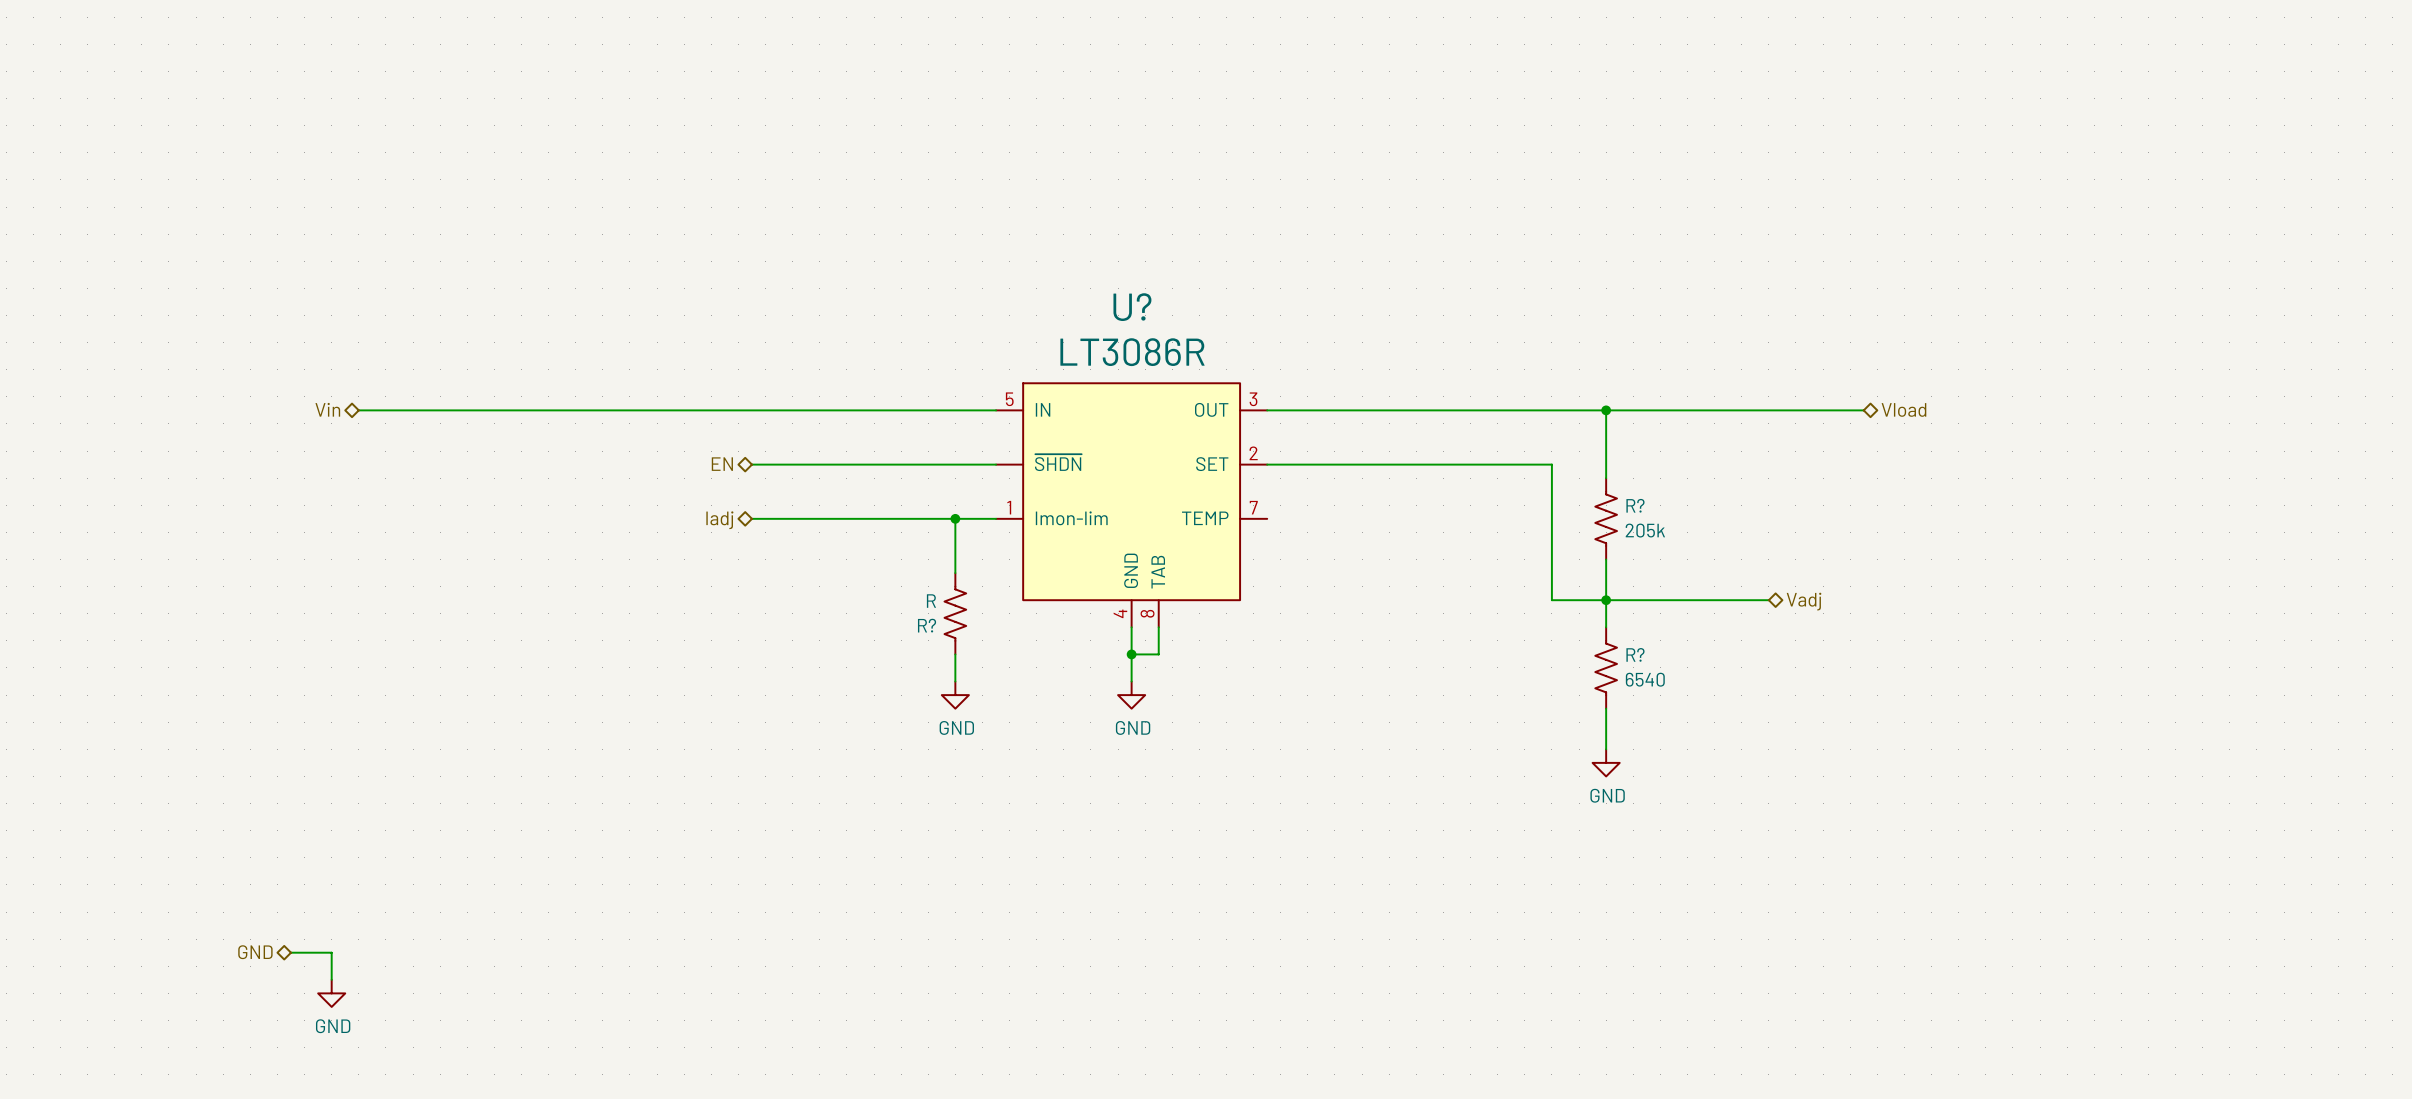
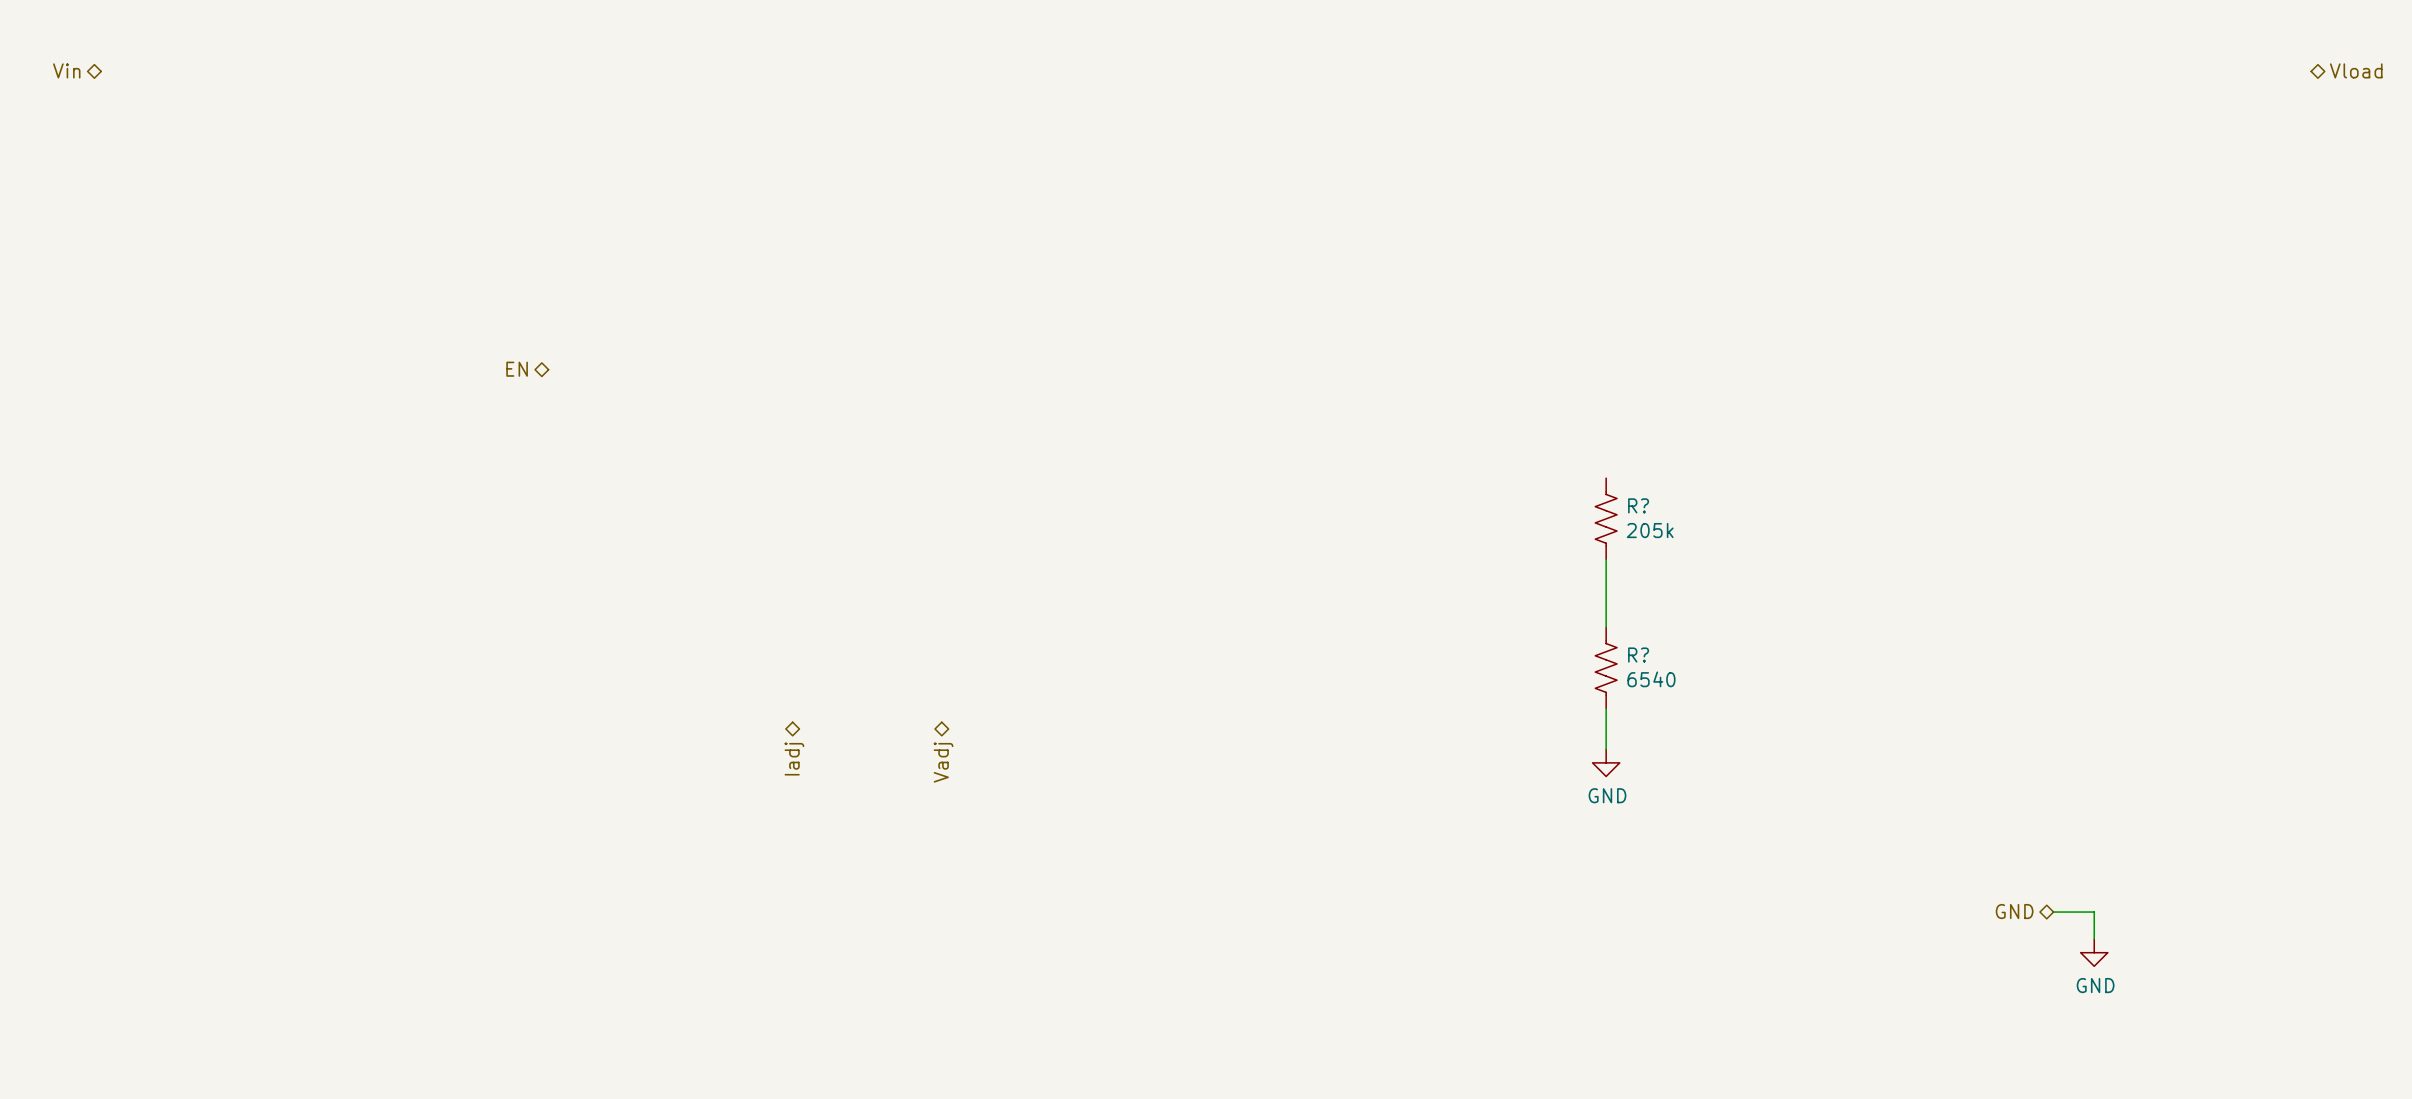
hierarchical label: none -> Vin (66, 70)
hierarchical label: none -> Vload (2356, 70)
hierarchical label: Vin (327, 409) -> none
hierarchical label: Vload (1903, 409) -> none
wire: (358, 410) (996, 410) -> none
wire: (1267, 410) (1863, 410) -> none
wire: (1606, 410) (1606, 478) -> none
junction: (1606, 410) -> none
hierarchical label position: EN (722, 464) -> EN (517, 369)
wire: (751, 464) (996, 464) -> none
wire: (1267, 464) (1551, 464) (1551, 600) (1768, 600) -> none
U?: LT3086R (1131, 505) -> none
wire: (751, 518) (996, 518) -> none
wire: (955, 518) (955, 573) -> none
junction: (955, 518) -> none
hierarchical label rotation: 0° (719, 520) -> 90° counterclockwise (794, 758)
hierarchical label position: Iadj (719, 520) -> Iadj (794, 758)
junction: (1606, 600) -> none
hierarchical label: Vadj (1804, 601) -> none
R?: R (955, 613) -> none
wire: (1131, 627) (1131, 681) -> none
wire: (1158, 627) (1158, 654) (1131, 654) -> none
wire: (955, 654) (955, 681) -> none
junction: (1131, 654) -> none
power symbol: GND (955, 695) -> none
power symbol: GND (1131, 695) -> none
hierarchical label: none -> Vadj (943, 762)
hierarchical label: none -> GND (2014, 911)
wire: none -> (2053, 912) (2094, 912) (2094, 939)
hierarchical label: GND (255, 952) -> none
wire: (291, 952) (331, 952) (331, 979) -> none
power symbol: none -> GND (2094, 952)
power symbol: GND (331, 993) -> none

